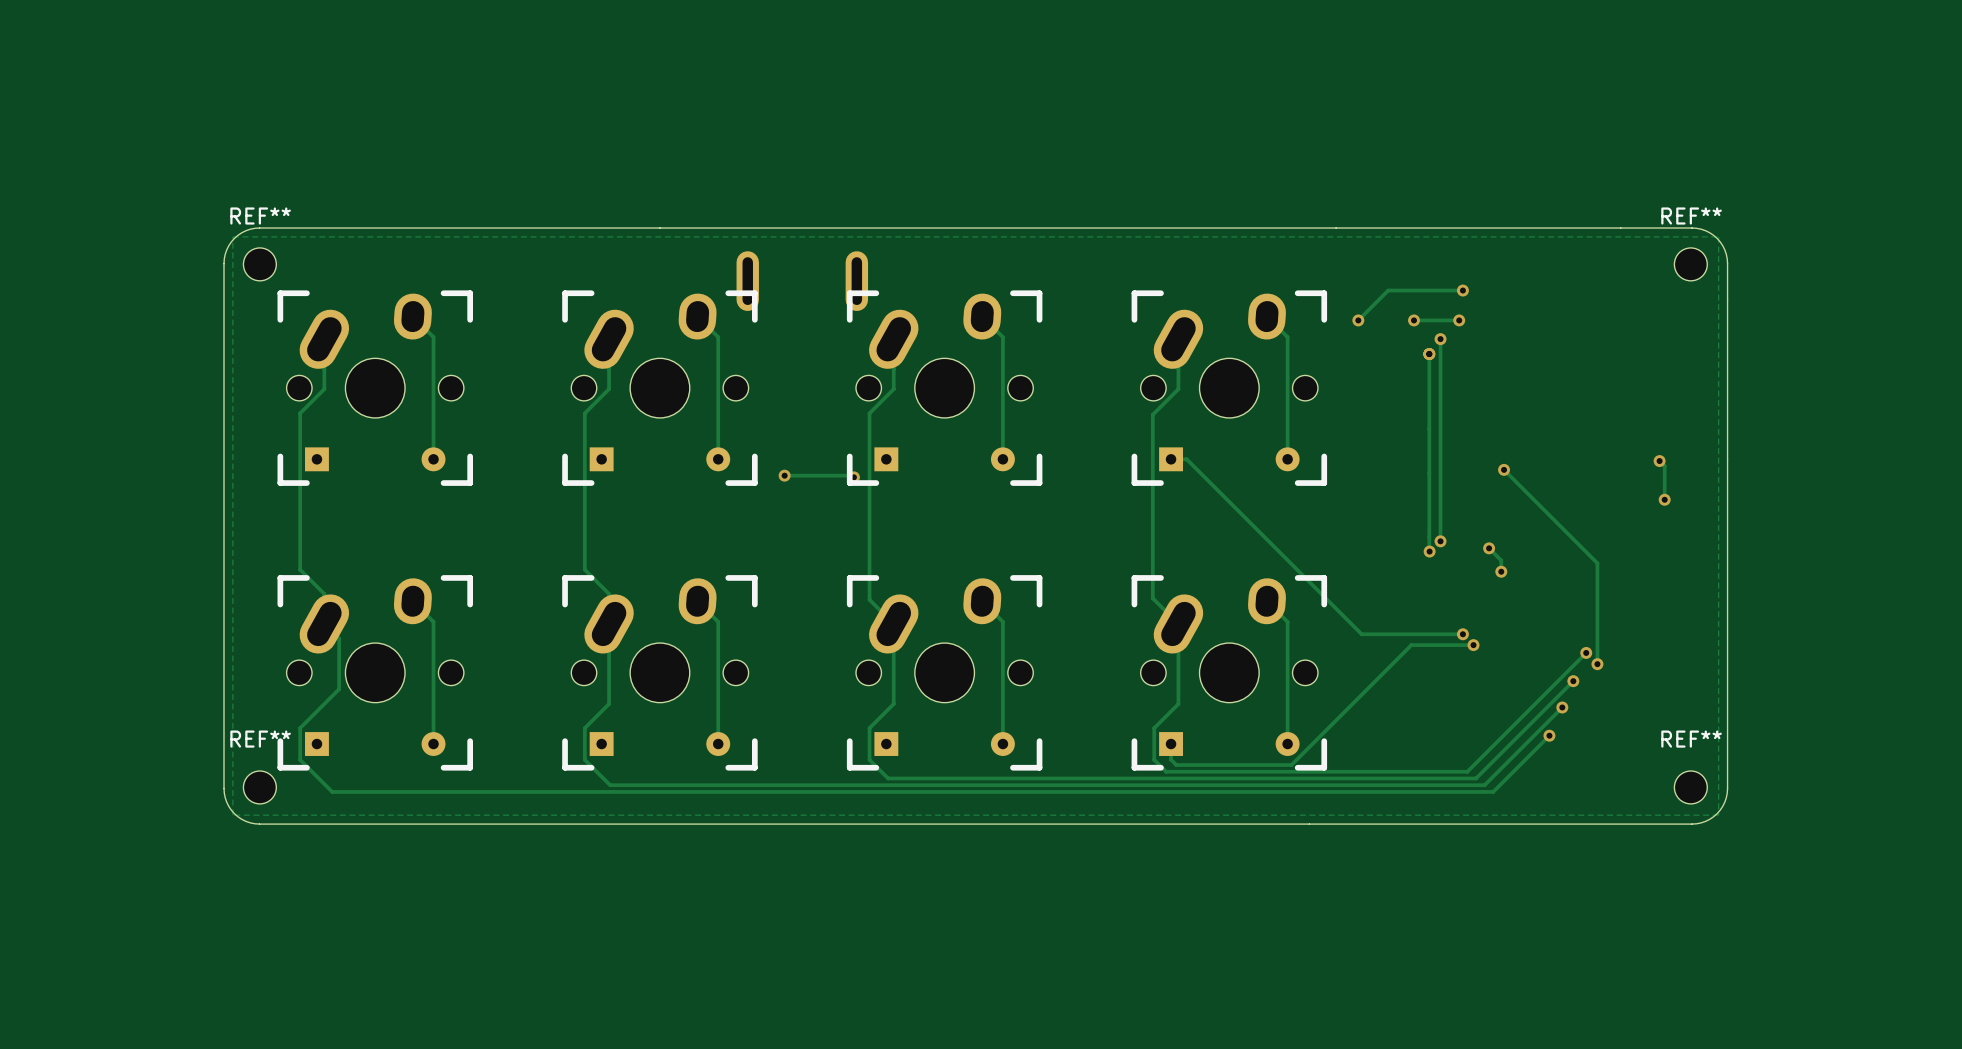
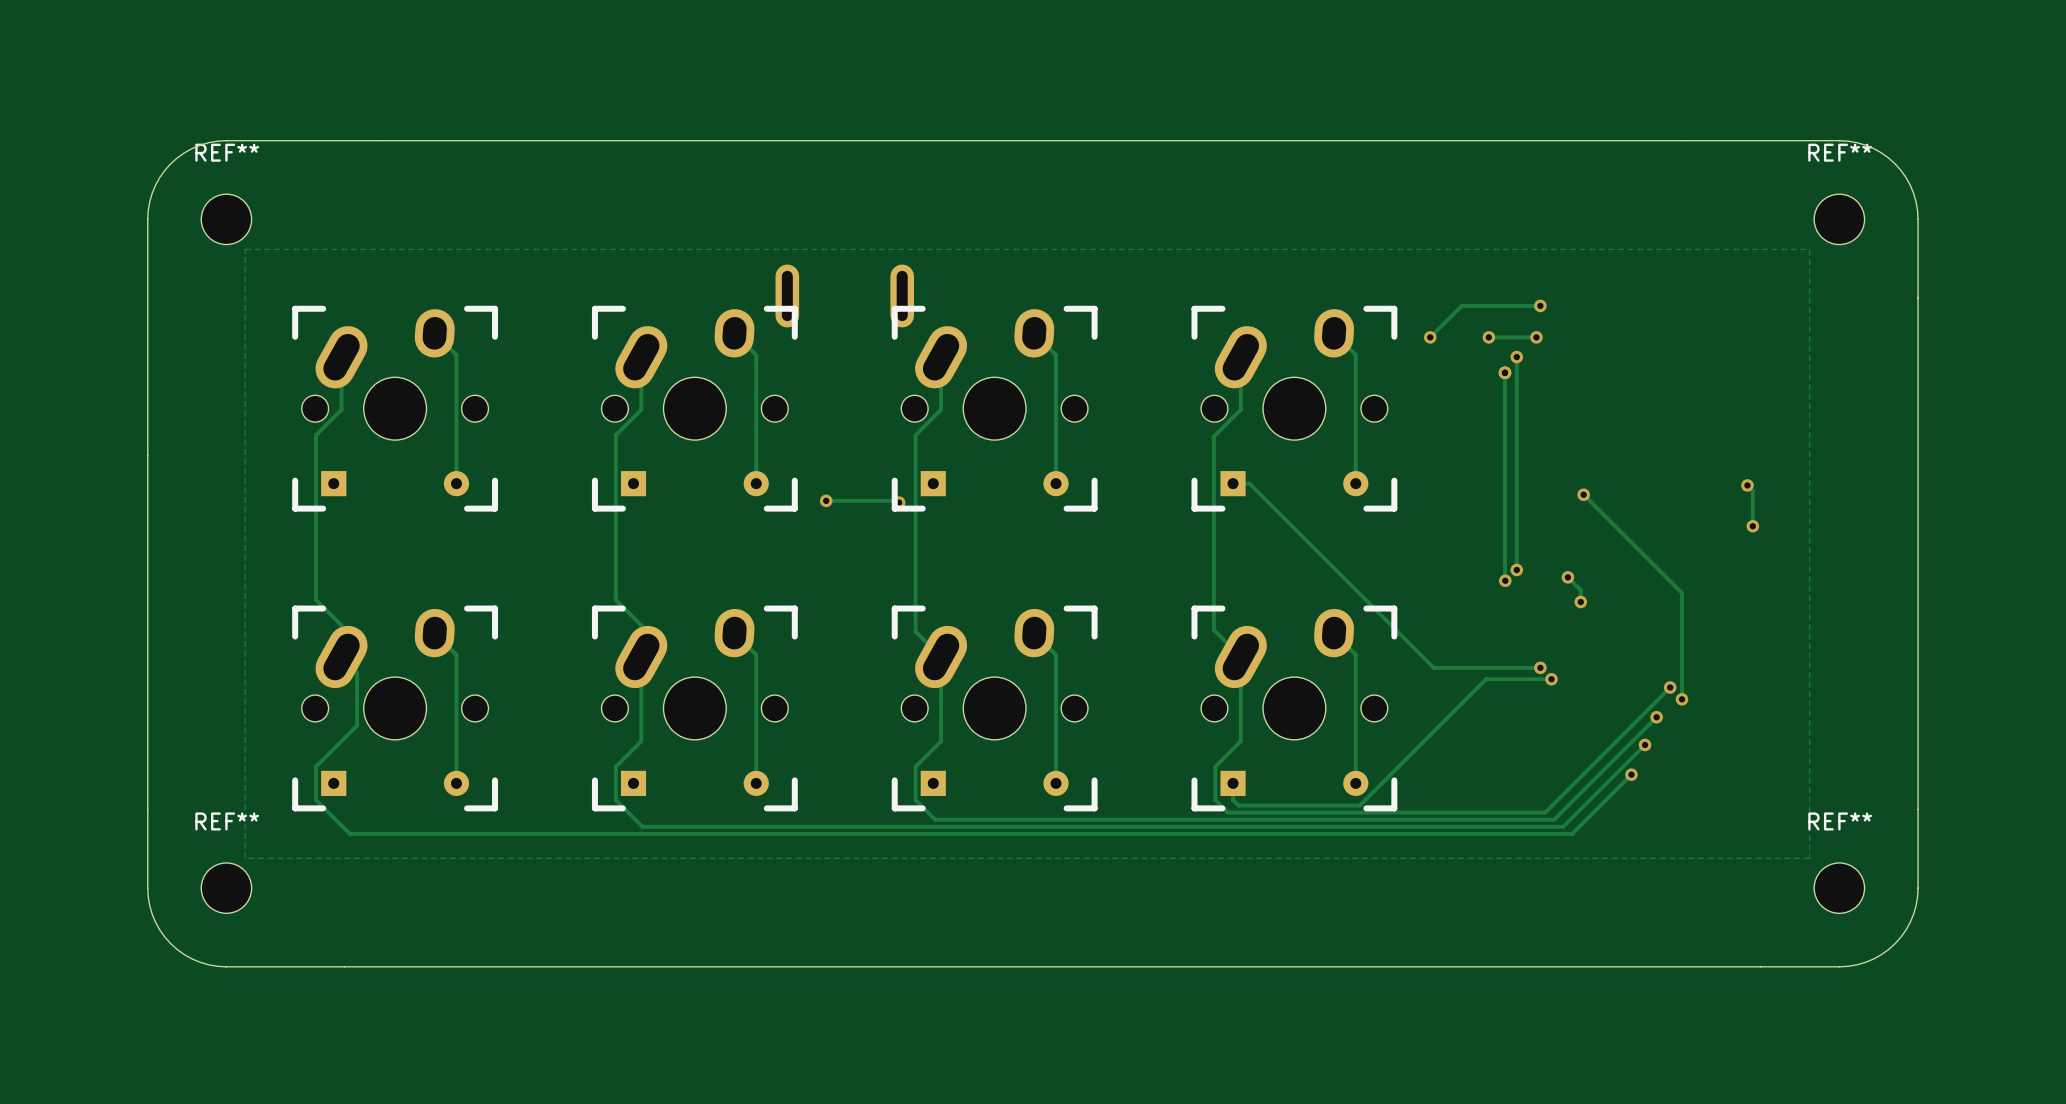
REF**: none -> (226, 219)
REF**: none -> (1839, 219)
board edge: (259, 228) (1691, 228) (1705, 230) (1713, 235) (1722, 245) (1727, 263) (1727, 788) (1724, 802) (1717, 813) (1709, 819) (1691, 824) (259, 824) (245, 821) (231, 810) (226, 802) (224, 788) (224, 263) (226, 249) (234, 238) (245, 230) (259, 228) -> (226, 140) (208, 142) (192, 148) (170, 163) (159, 177) (152, 193) (147, 219) (148, 896) (155, 922) (164, 937) (177, 949) (192, 959) (208, 964) (226, 966) (1839, 966) (1856, 964) (1881, 954) (1895, 943) (1910, 922) (1916, 905) (1918, 888) (1918, 219) (1913, 193) (1905, 177) (1895, 163) (1873, 148) (1856, 142) (1839, 140) (226, 140)
REF**: (259, 264) -> none
REF**: (1690, 264) -> none
REF**: (259, 787) -> none
REF**: (1690, 787) -> none
REF**: none -> (226, 888)
REF**: none -> (1839, 888)

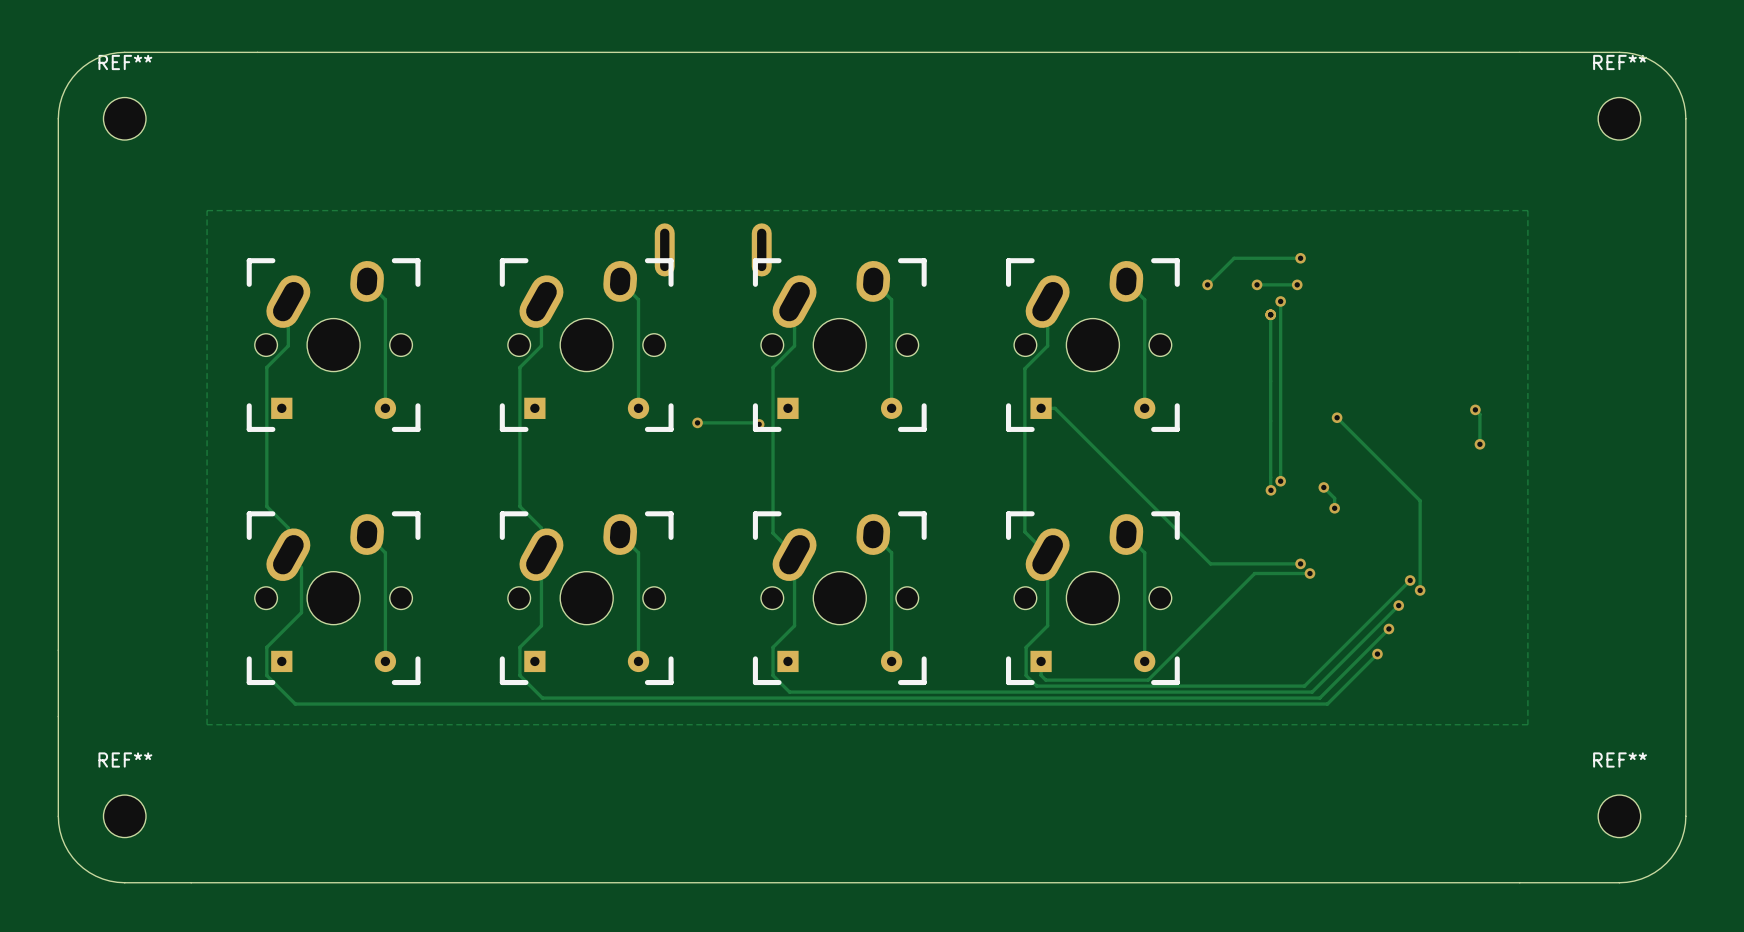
board edge: (226, 140) (1839, 140) (1856, 142) (1873, 148) (1895, 163) (1905, 177) (1913, 193) (1918, 219) (1918, 888) (1916, 905) (1910, 922) (1895, 943) (1881, 954) (1856, 964) (1839, 966) (226, 966) (208, 964) (192, 959) (177, 949) (164, 937) (155, 922) (148, 896) (147, 219) (152, 193) (159, 177) (170, 163) (192, 148) (208, 142) (226, 140) -> (124, 52) (109, 54) (95, 58) (77, 71) (68, 83) (62, 96) (58, 118) (58, 816) (59, 831) (68, 851) (83, 868) (95, 876) (109, 881) (124, 882) (1619, 882) (1634, 881) (1654, 872) (1666, 863) (1679, 845) (1684, 831) (1685, 816) (1685, 118) (1682, 96) (1675, 83) (1666, 71) (1648, 58) (1634, 54) (1619, 52) (124, 52)
REF** position: (226, 219) -> (124, 118)
REF** position: (1839, 219) -> (1619, 118)
REF** position: (226, 888) -> (124, 816)
REF** position: (1839, 888) -> (1619, 816)

